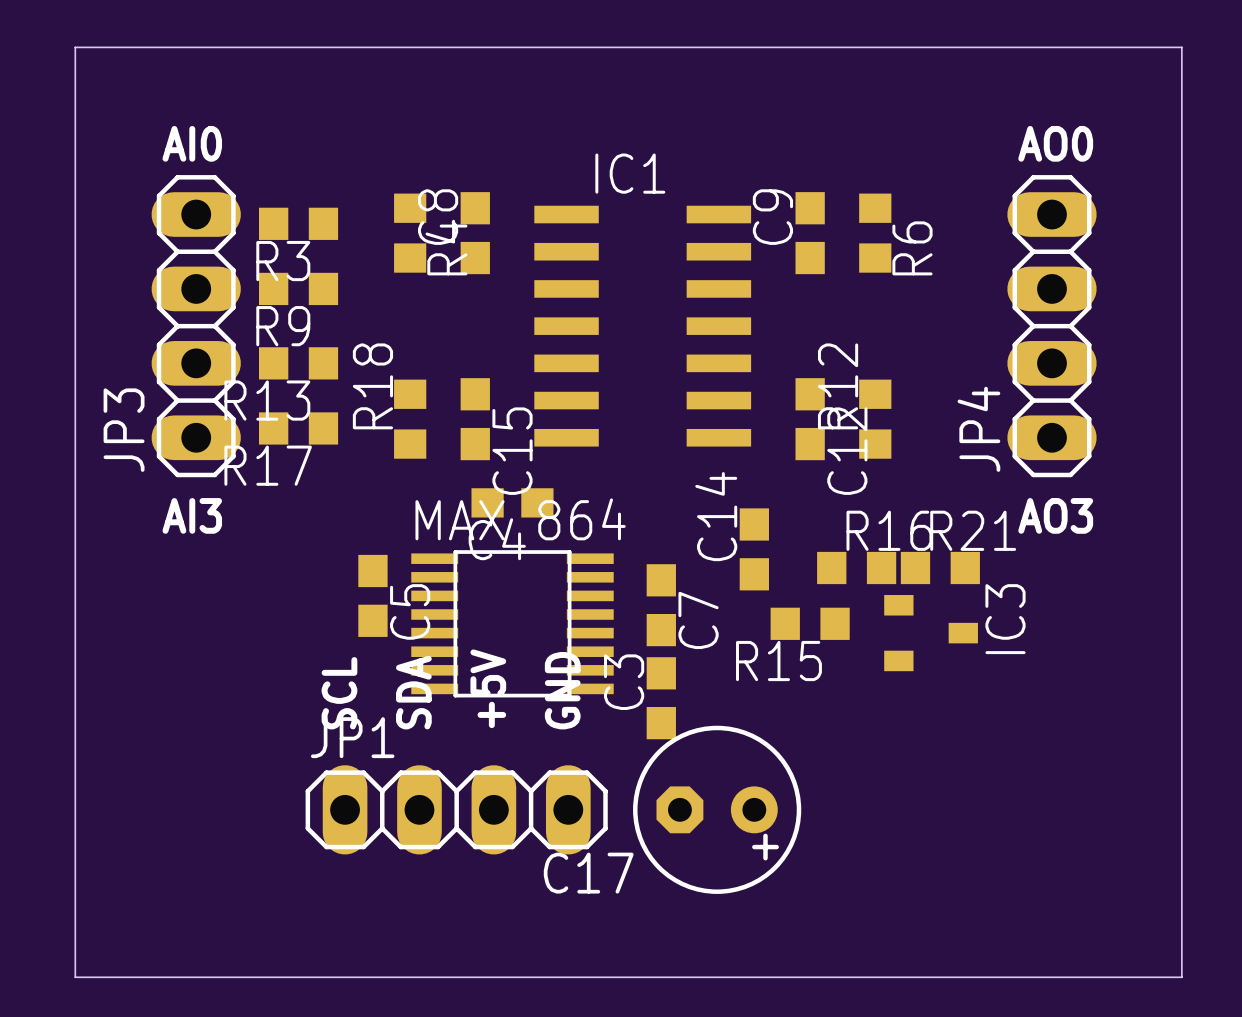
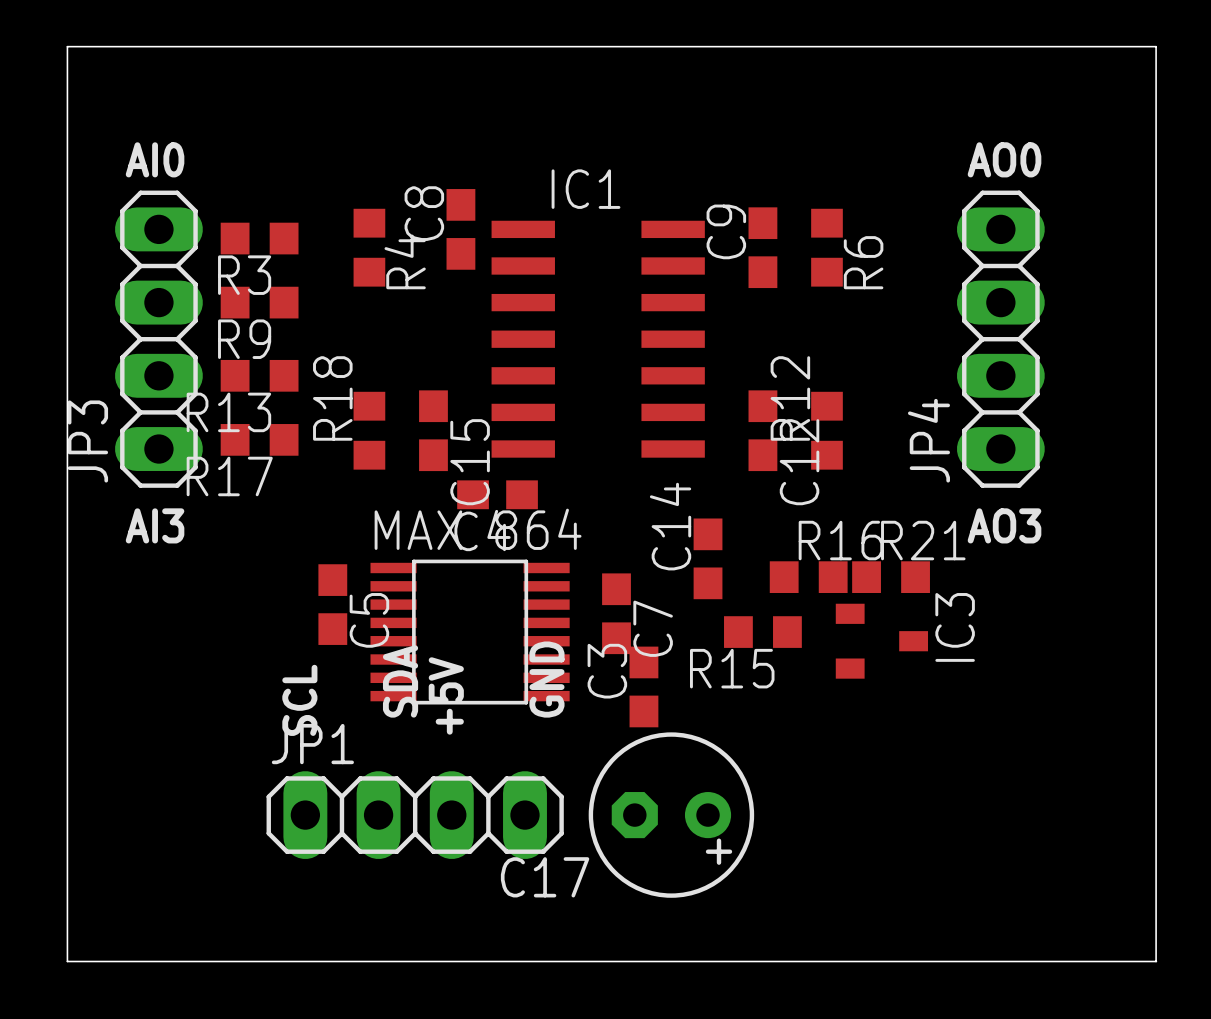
text position: AI0 (192, 143) -> AI0 (155, 159)
text position: AO0 (1055, 143) -> AO0 (1004, 159)
R3 position: (298, 223) -> (259, 238)
R4 position: (410, 233) -> (369, 247)
C9 position: (810, 233) -> (762, 247)
R6 position: (875, 233) -> (826, 247)
R9 position: (298, 288) -> (259, 302)
JP3 position: (196, 326) -> (158, 339)
IC1 position: (642, 326) -> (598, 339)
JP4 position: (1052, 326) -> (1000, 339)
R13 position: (298, 363) -> (259, 375)
R18 position: (410, 419) -> (369, 430)
C15 position: (475, 419) -> (433, 430)
C12 position: (810, 419) -> (762, 430)
R12 position: (875, 419) -> (826, 430)
R17 position: (298, 428) -> (259, 439)
text position: AI3 (192, 515) -> AI3 (155, 525)
text position: AO3 (1055, 515) -> AO3 (1004, 525)
C14 position: (754, 549) -> (708, 558)
R16 position: (856, 568) -> (808, 577)
R21 position: (940, 568) -> (891, 577)
C5 position: (372, 595) -> (332, 604)
C7 position: (661, 605) -> (616, 613)
part position: (512, 623) -> (470, 632)
R15 position: (810, 623) -> (762, 632)
IC3 position: (931, 633) -> (881, 641)
text position: +5V (488, 688) -> +5V (446, 695)
text position: SCL (339, 693) -> SCL (299, 700)
JP1 position: (456, 809) -> (415, 815)
C17 position: (717, 809) -> (671, 815)

